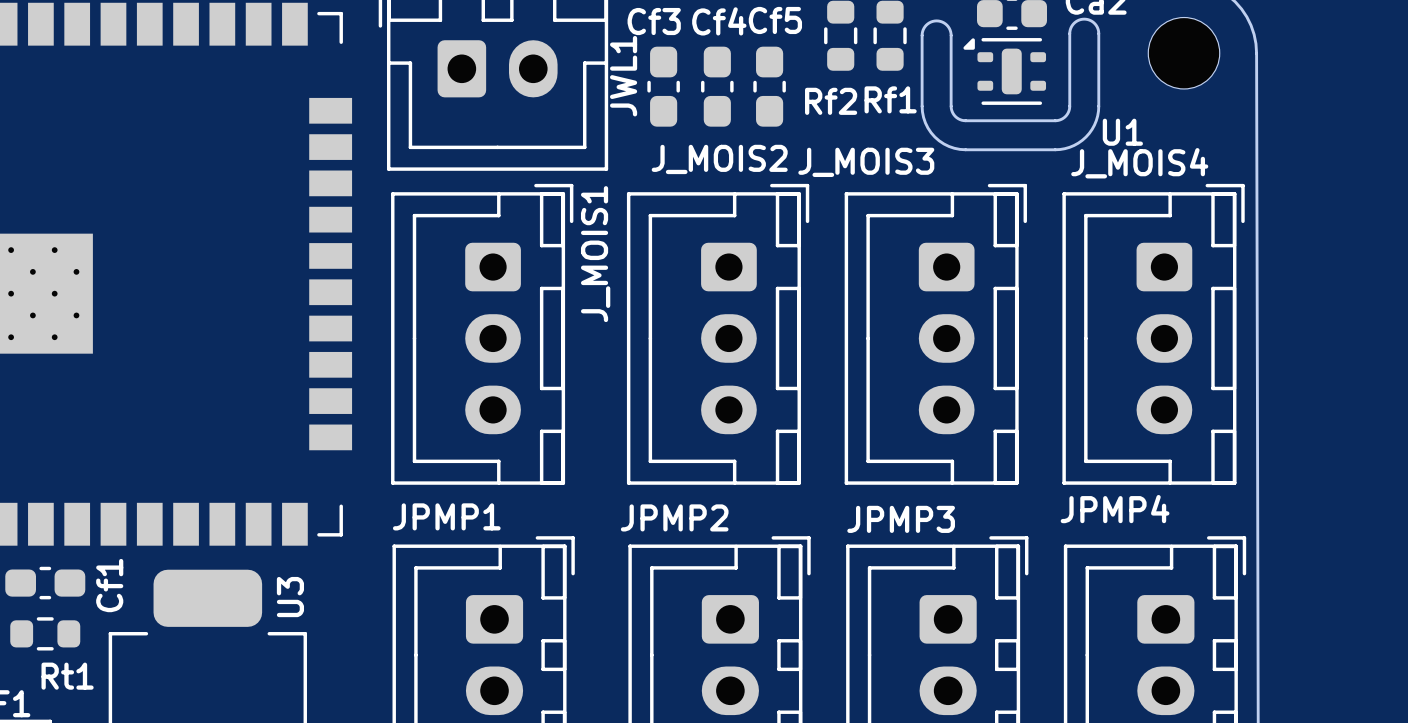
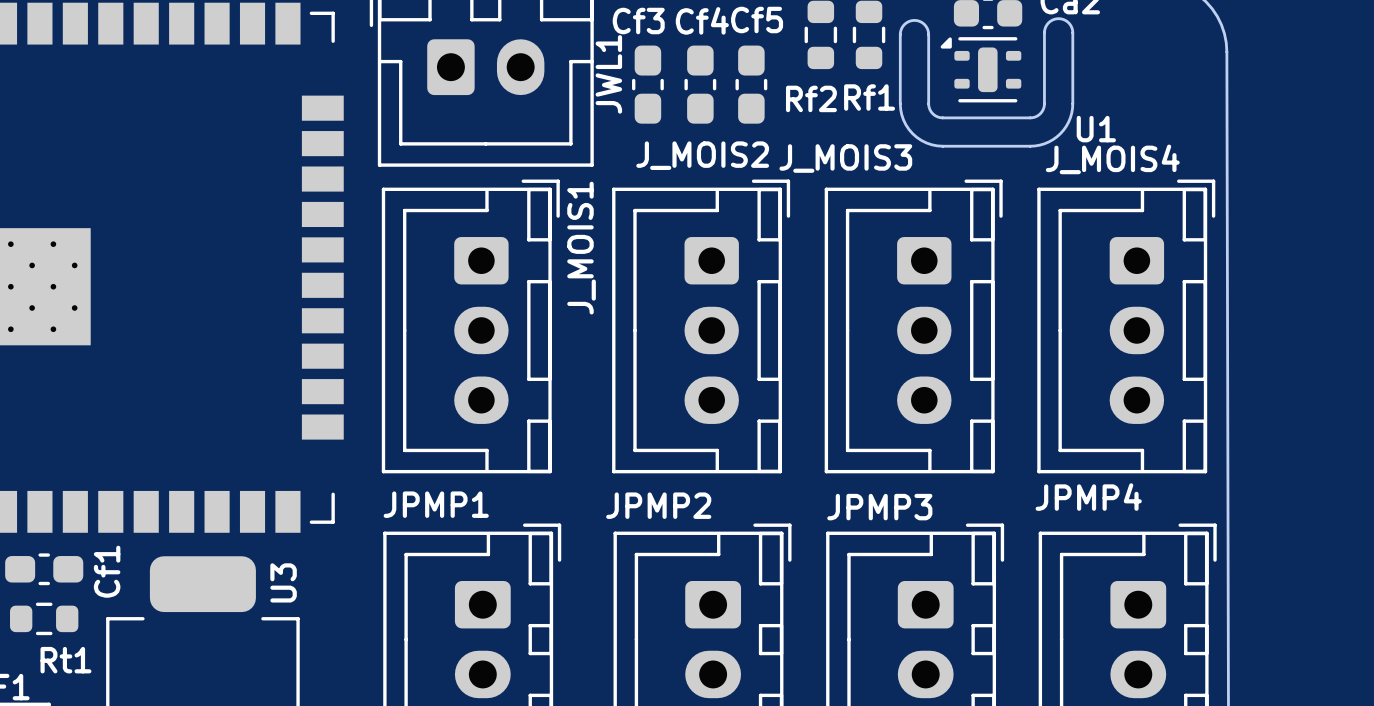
part: (1184, 53) -> none

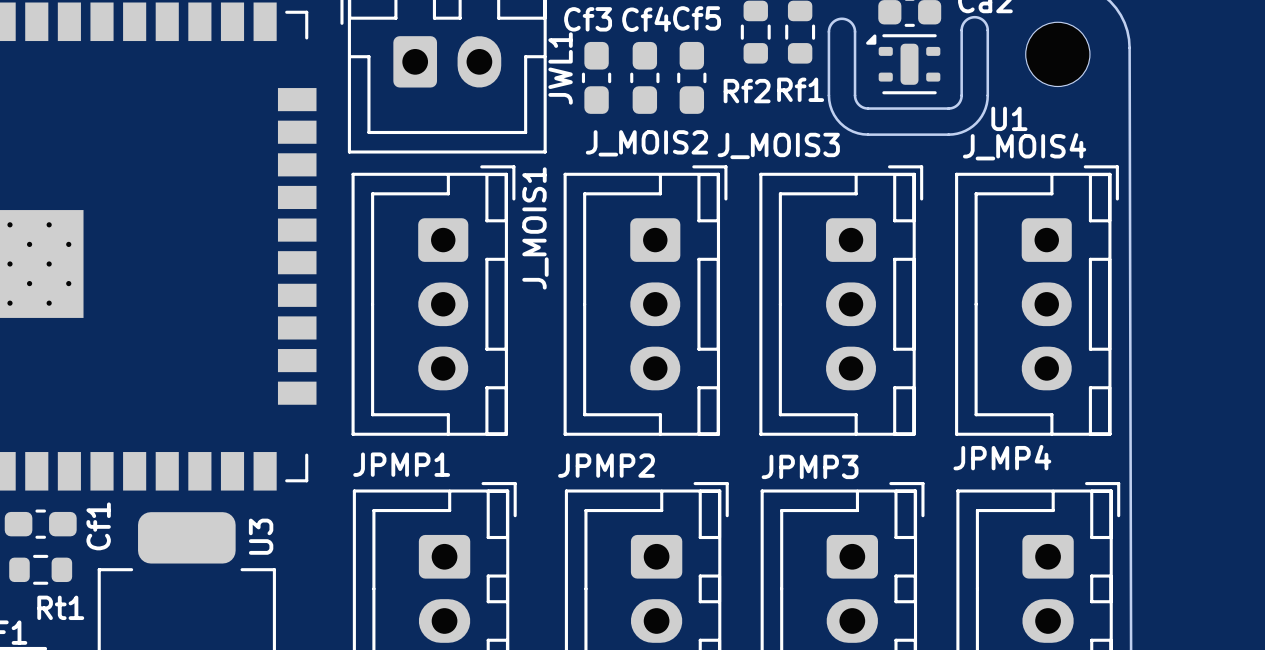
part: none -> (1057, 54)

